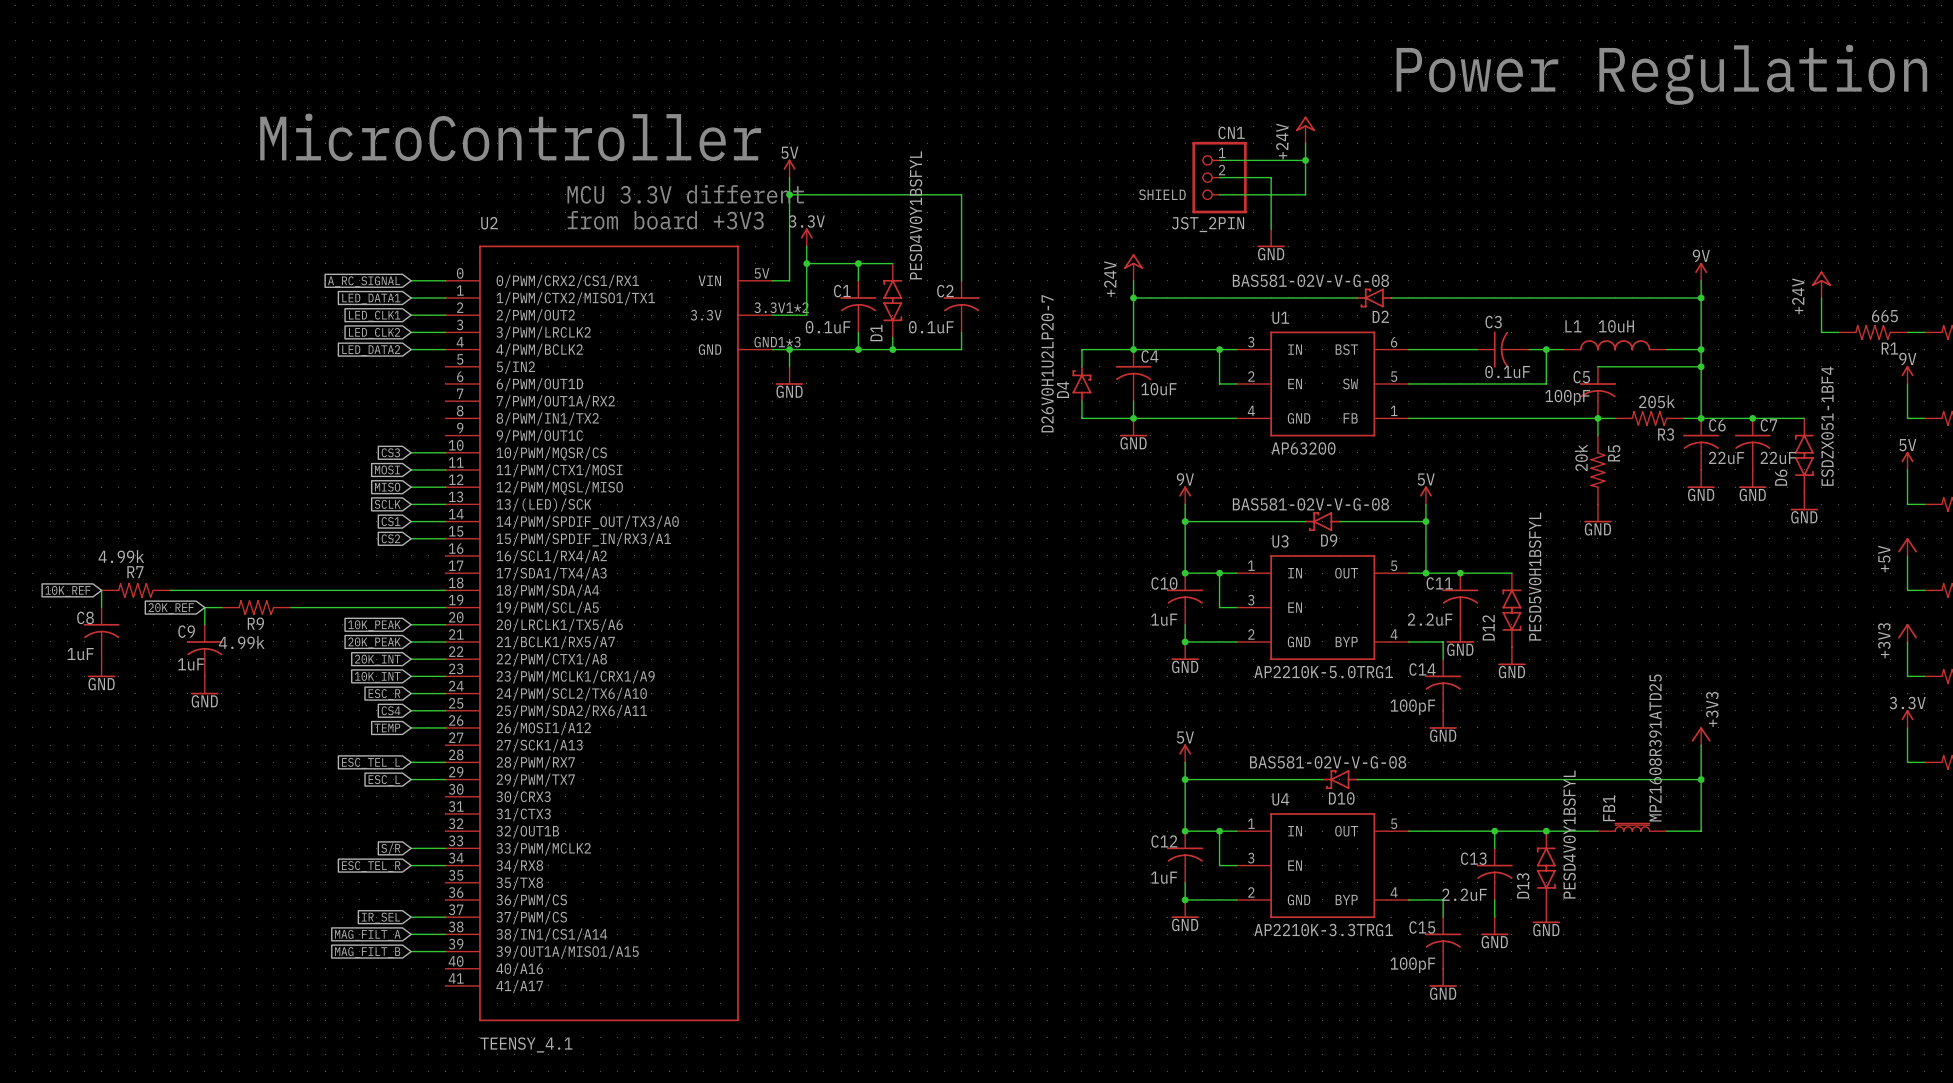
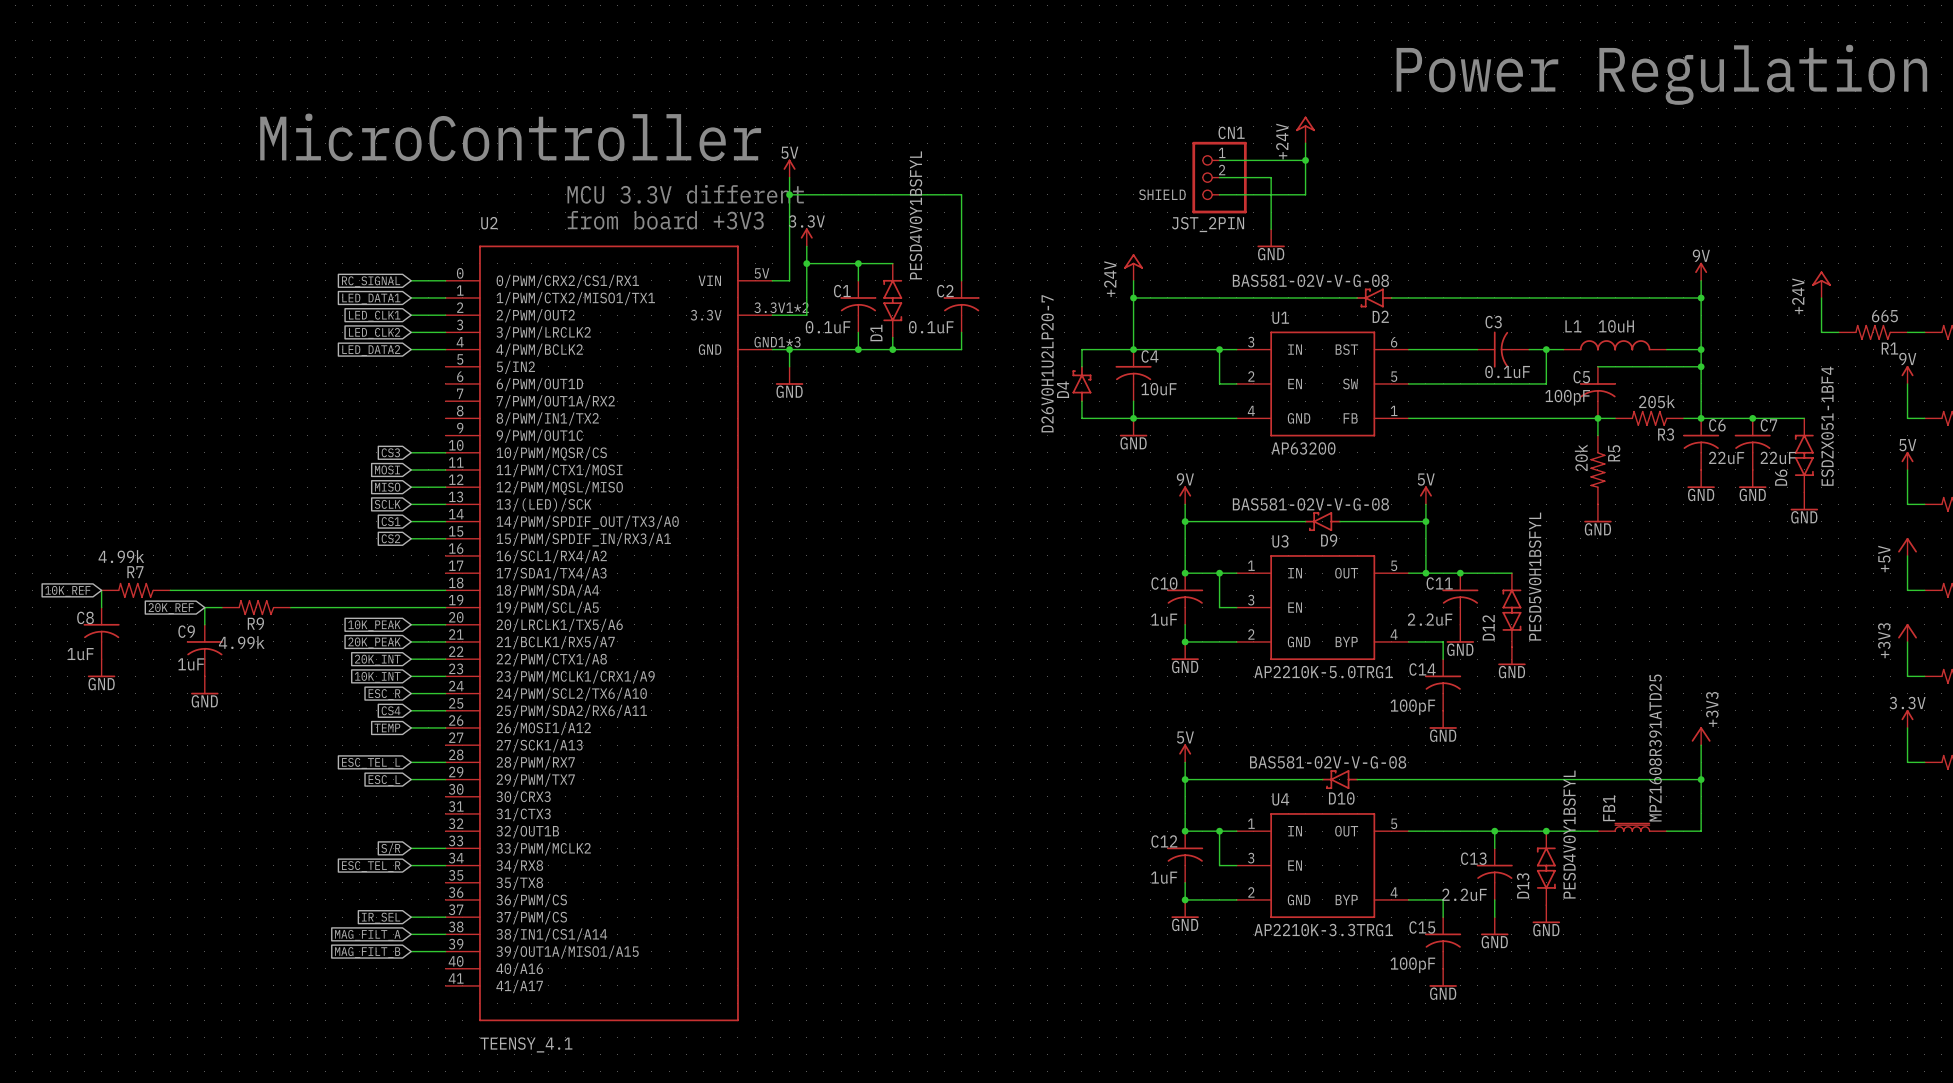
global label: A_RC_SIGNAL (364, 281) -> RC_SIGNAL (371, 281)

